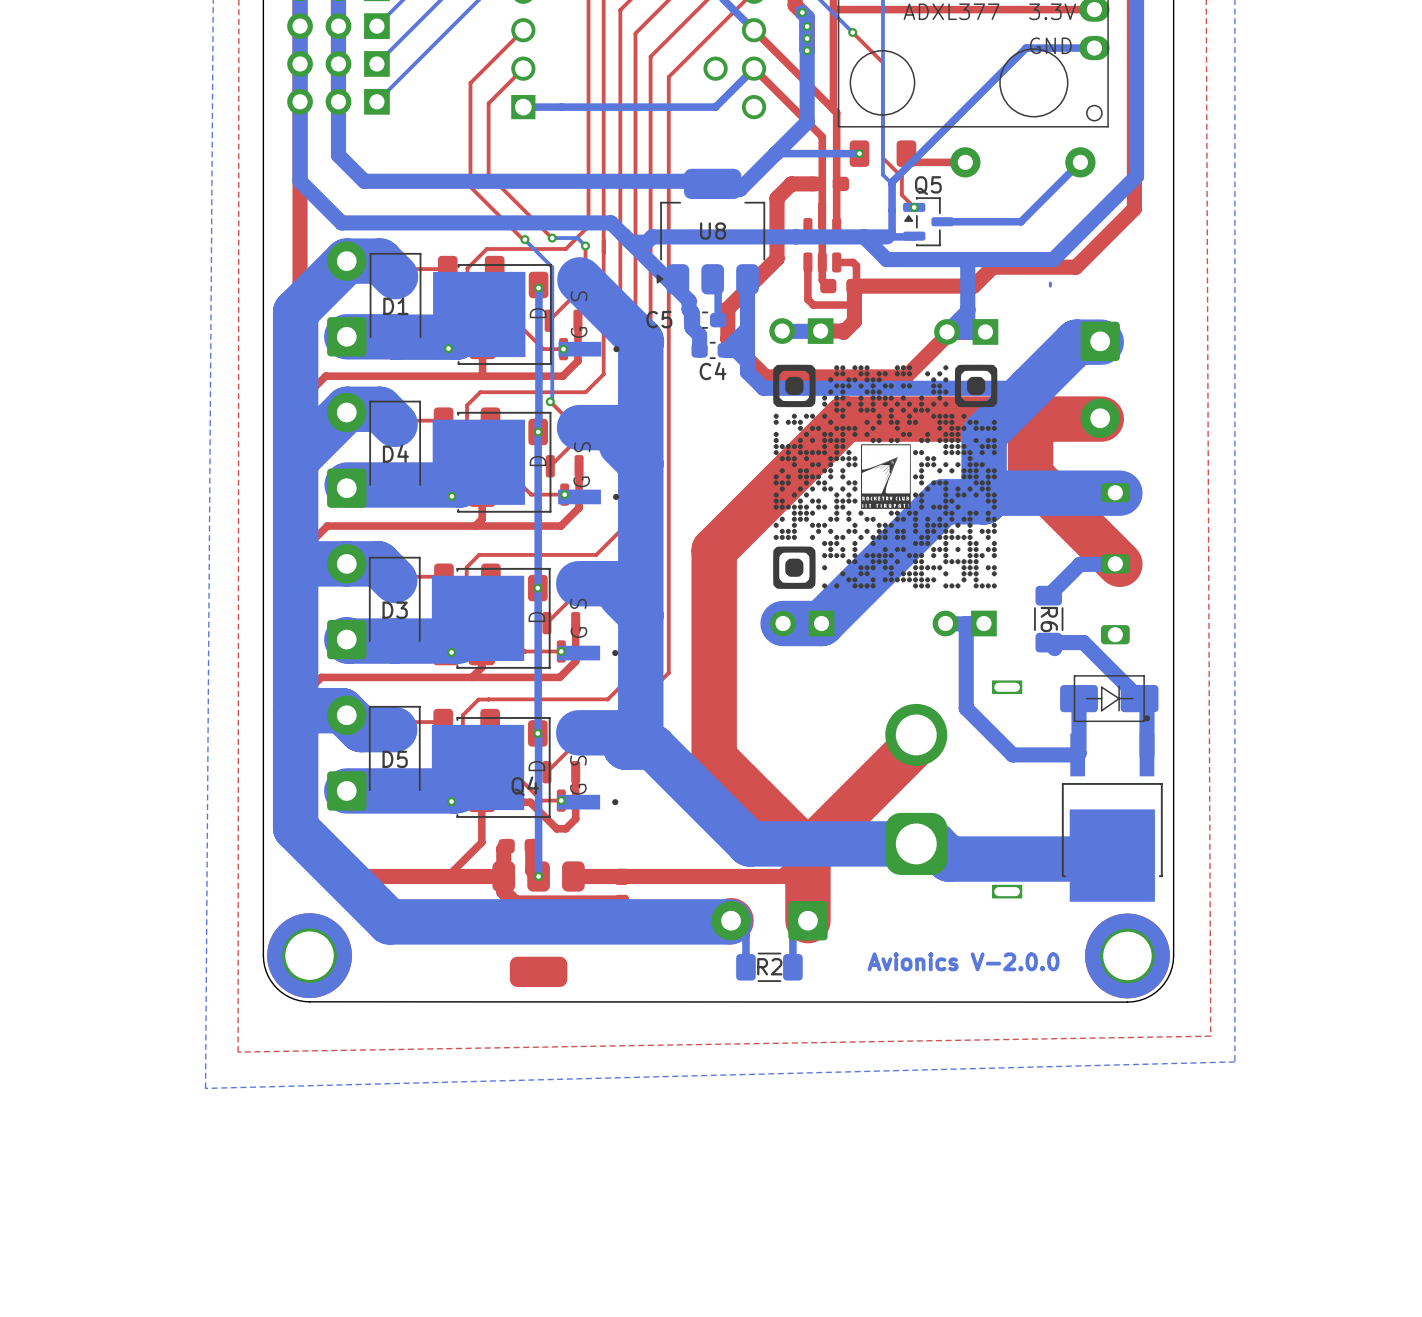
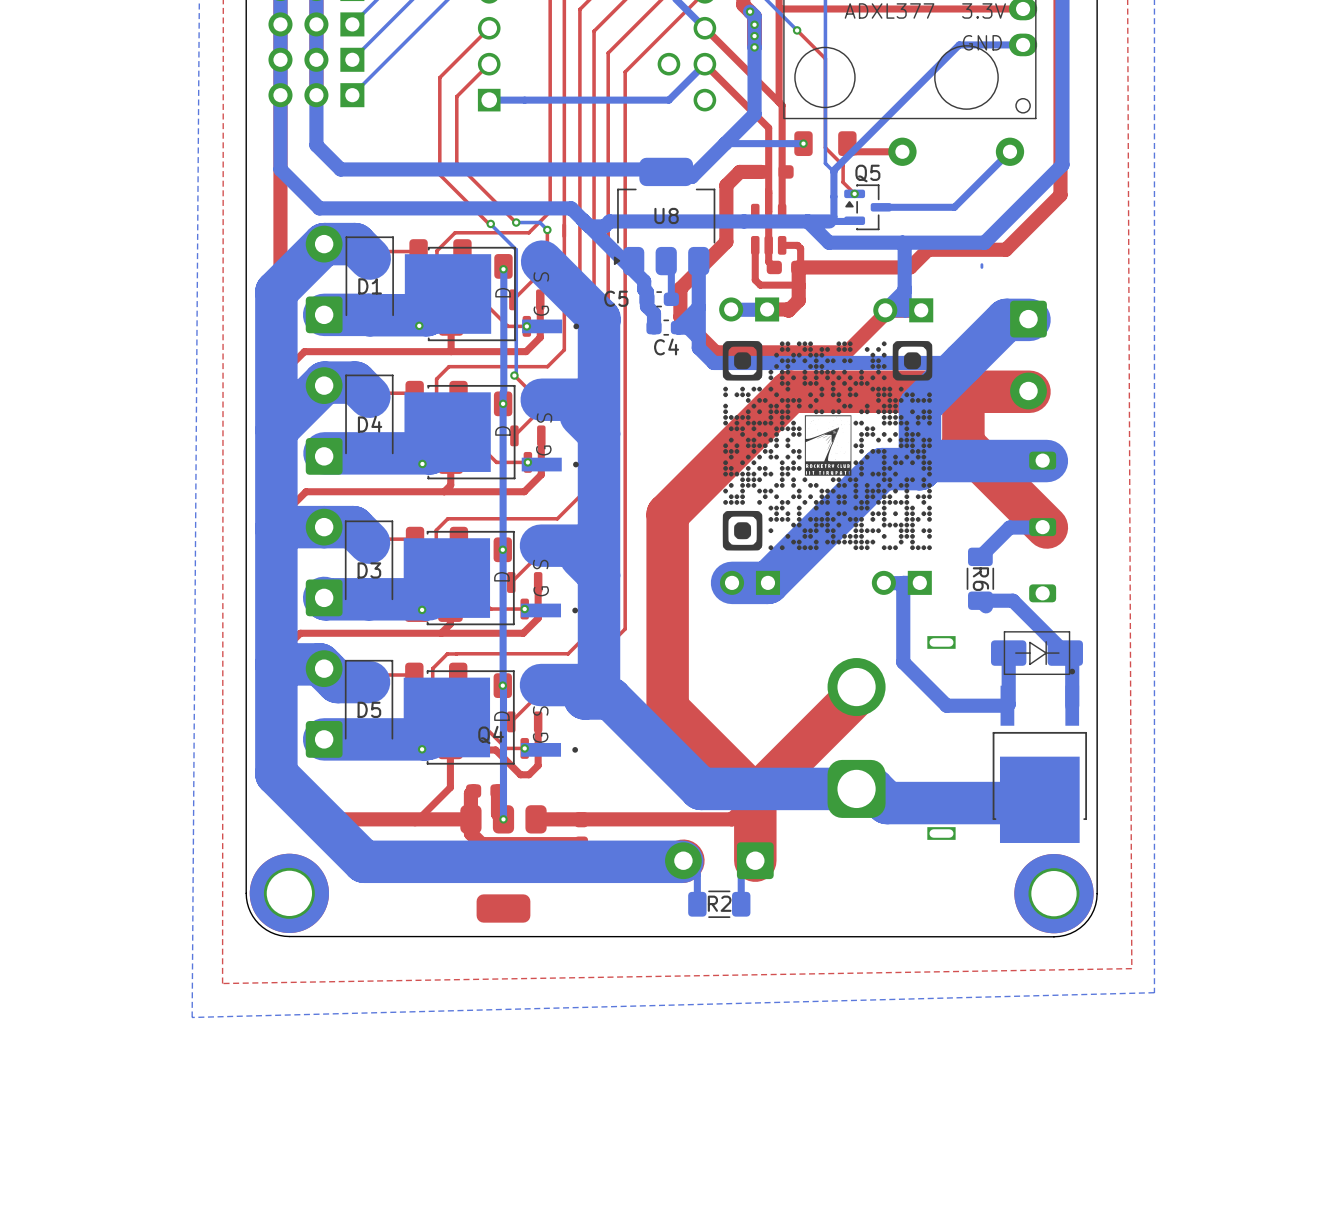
text: Avionics V-2.0.0 (963, 961) -> none

